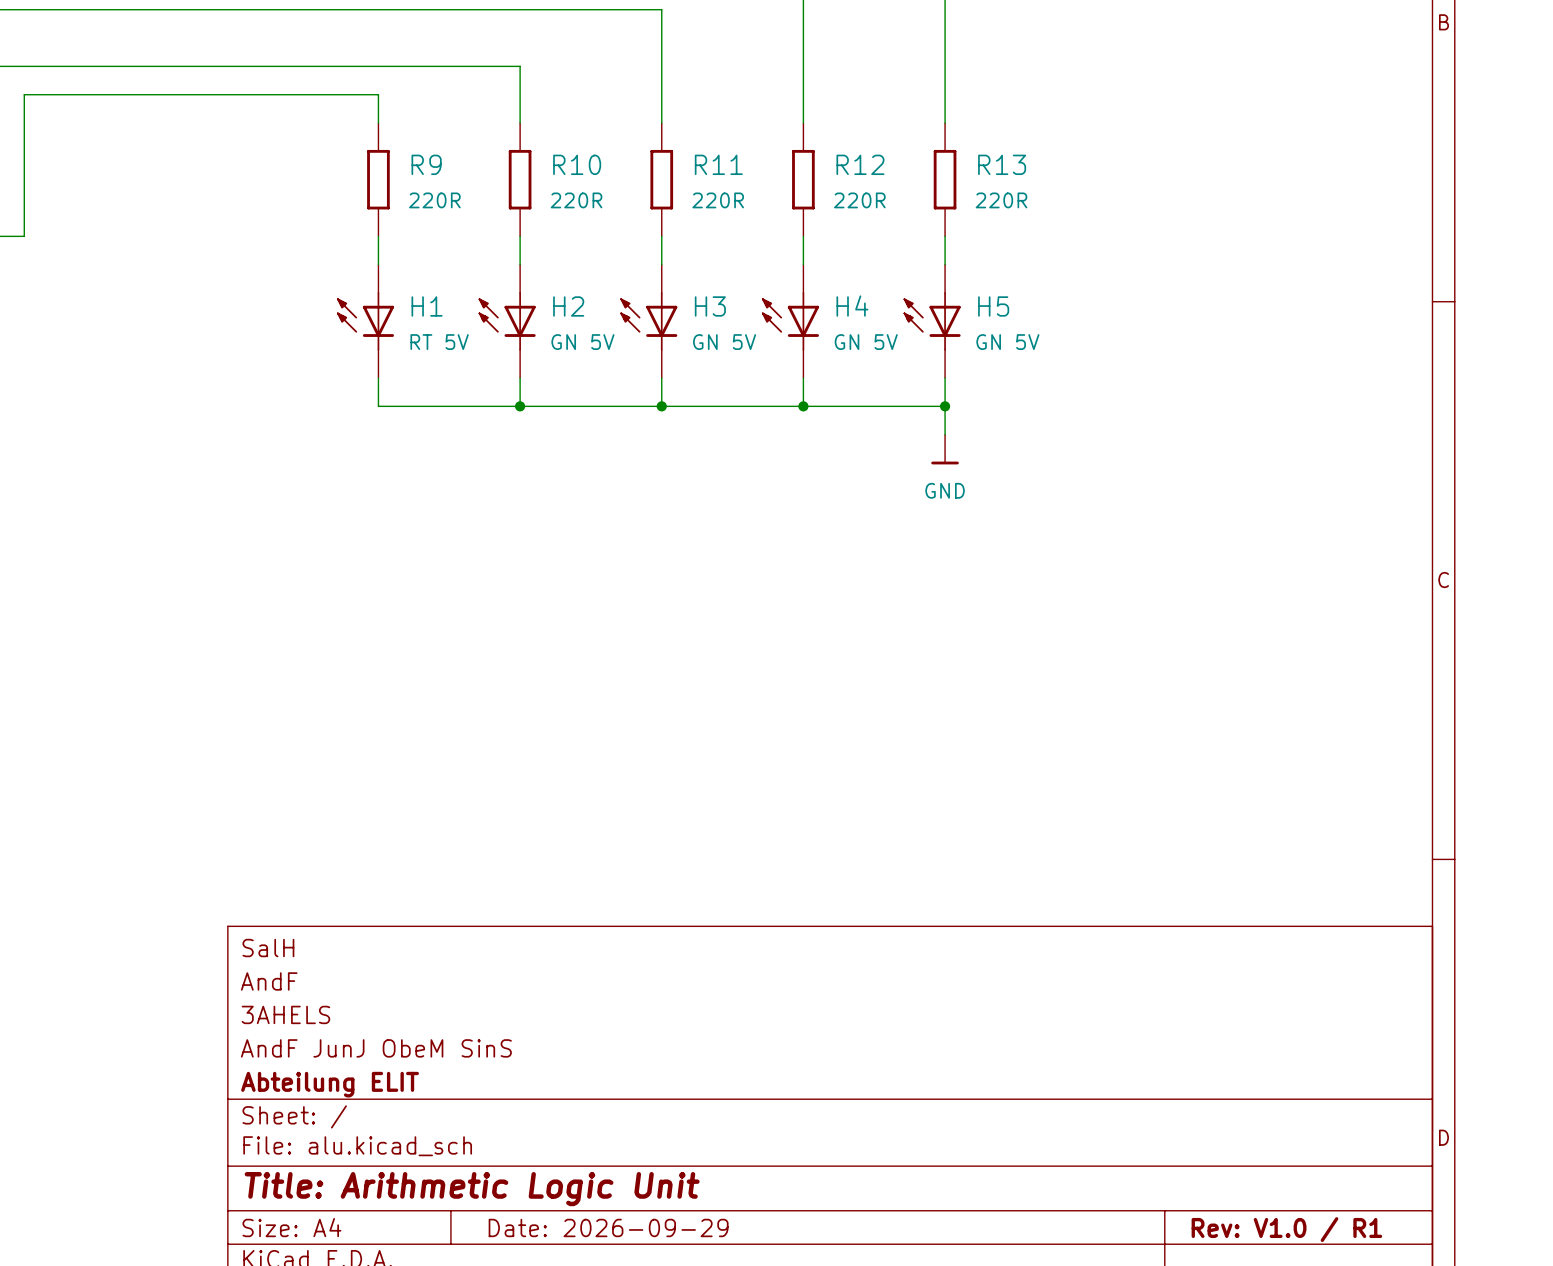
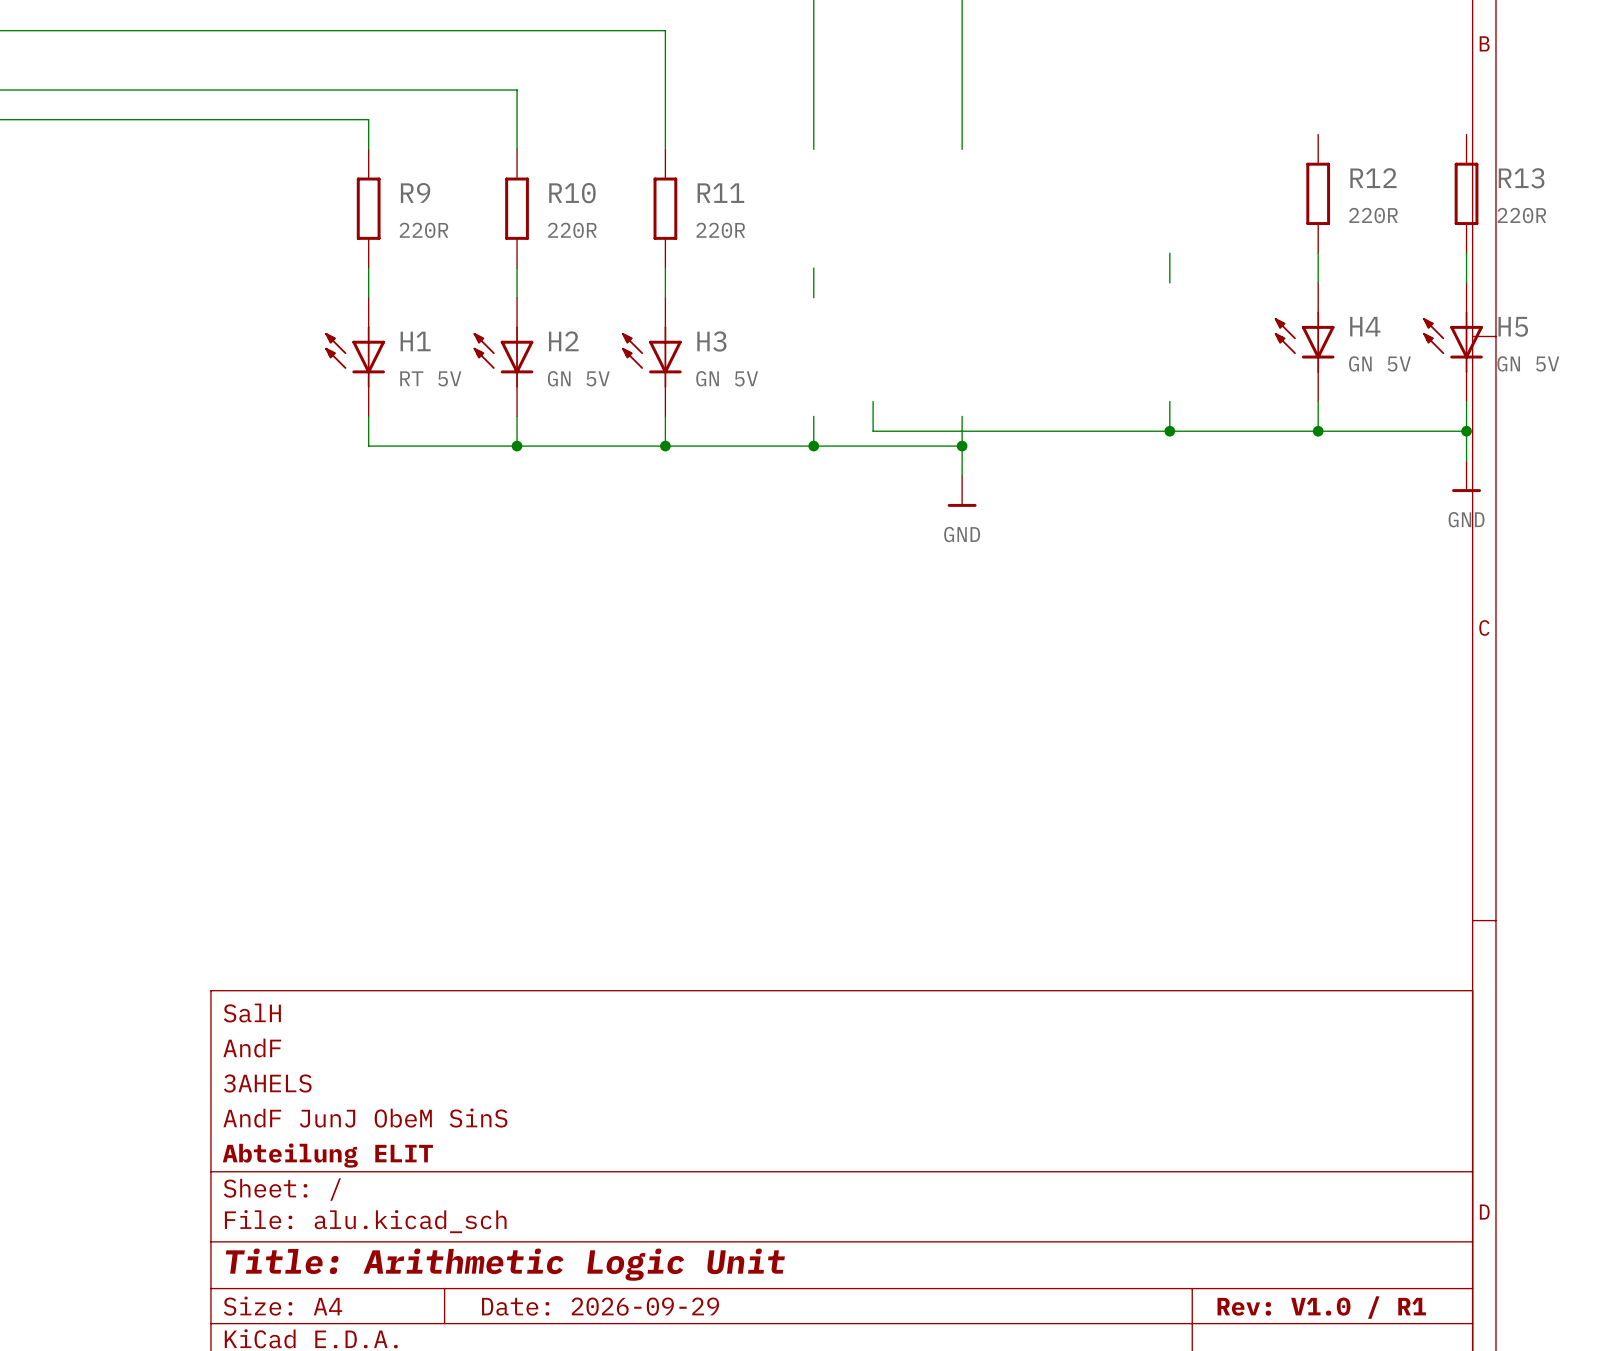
R12 position: (803, 179) -> (1318, 193)
R13 position: (945, 179) -> (1466, 193)
wire: none -> (1318, 253) (1318, 282)
wire: none -> (1466, 253) (1466, 282)
wire: (945, 236) (945, 264) -> (1169, 253) (1169, 282)
H4 position: (790, 321) -> (1304, 342)
H5 position: (932, 321) -> (1453, 342)
wire: none -> (873, 401) (873, 431) (1466, 431)
wire: none -> (1169, 401) (1169, 431)
wire: none -> (1318, 401) (1318, 431)
wire: none -> (1466, 401) (1466, 460)
junction: none -> (1169, 431)
junction: none -> (1318, 431)
junction: none -> (1466, 431)
power symbol: none -> GND (1466, 476)

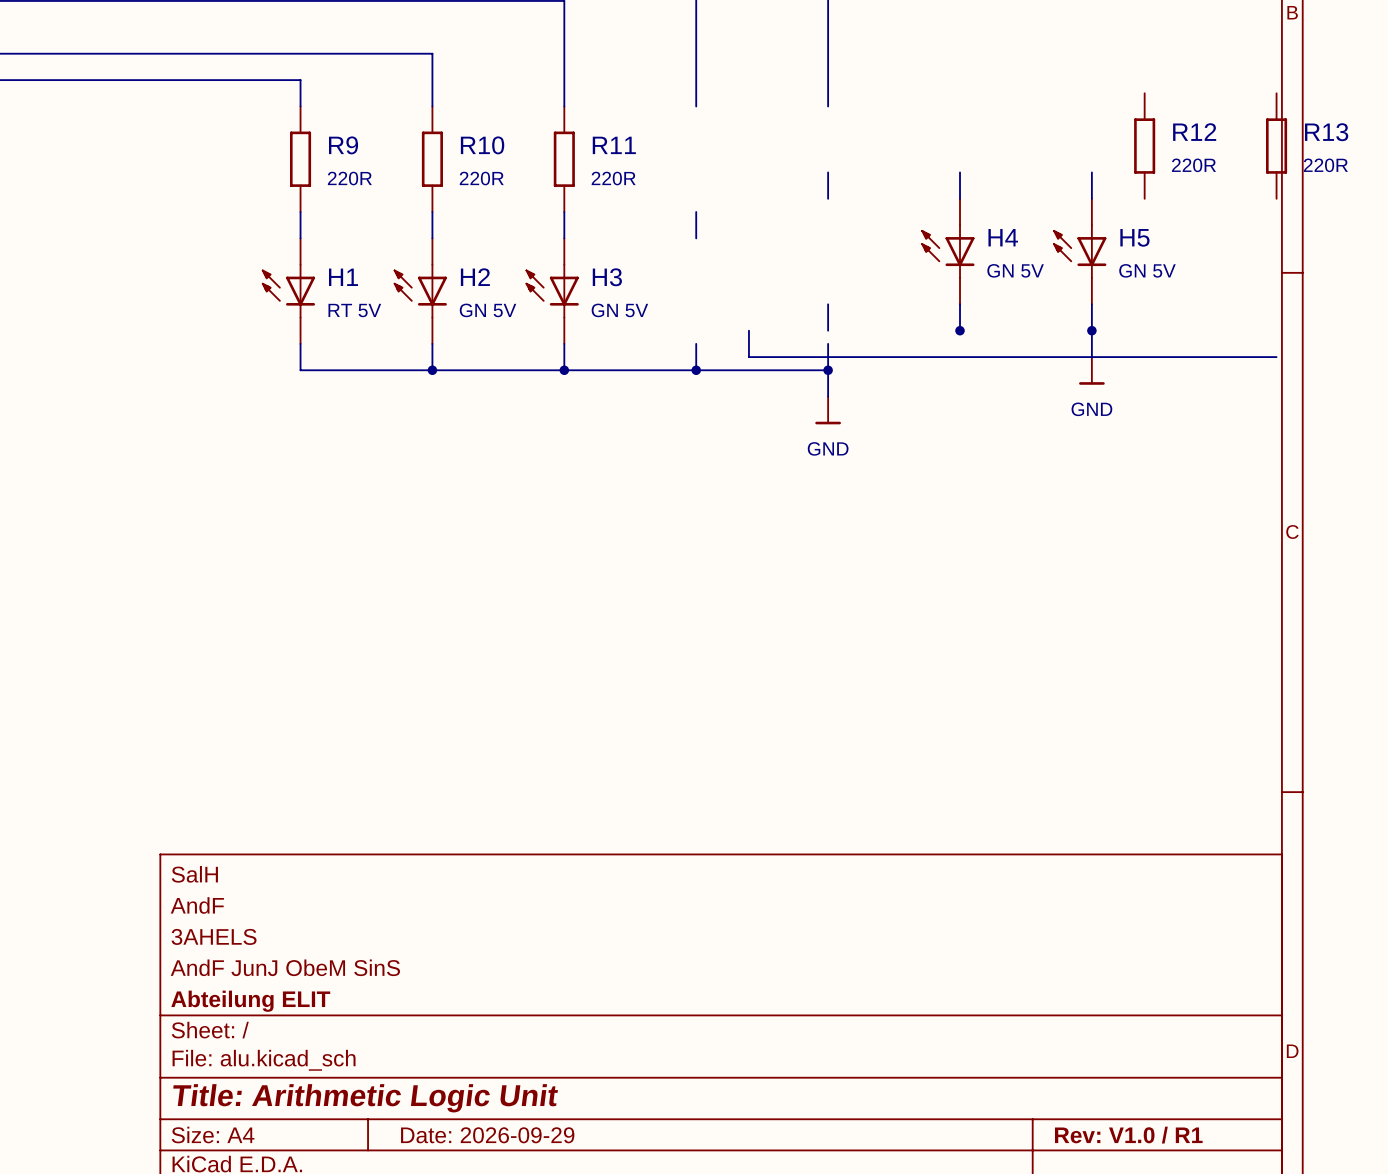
wire: (1169, 253) (1169, 282) -> (828, 172) (828, 198)
wire: (1318, 253) (1318, 282) -> (960, 172) (960, 198)
wire: (1466, 253) (1466, 282) -> (1091, 172) (1091, 198)
H4 position: (1304, 342) -> (947, 251)
H5 position: (1453, 342) -> (1079, 251)
junction: none -> (960, 330)
wire: (1169, 401) (1169, 431) -> (828, 304) (828, 330)
junction: none -> (1091, 330)
wire: (1318, 401) (1318, 431) -> (960, 304) (960, 330)
wire: (1466, 401) (1466, 460) -> (1091, 304) (1091, 357)
junction: (1169, 431) -> none
junction: (1318, 431) -> none
junction: (1466, 431) -> none
power symbol position: GND (1466, 476) -> GND (1091, 370)

